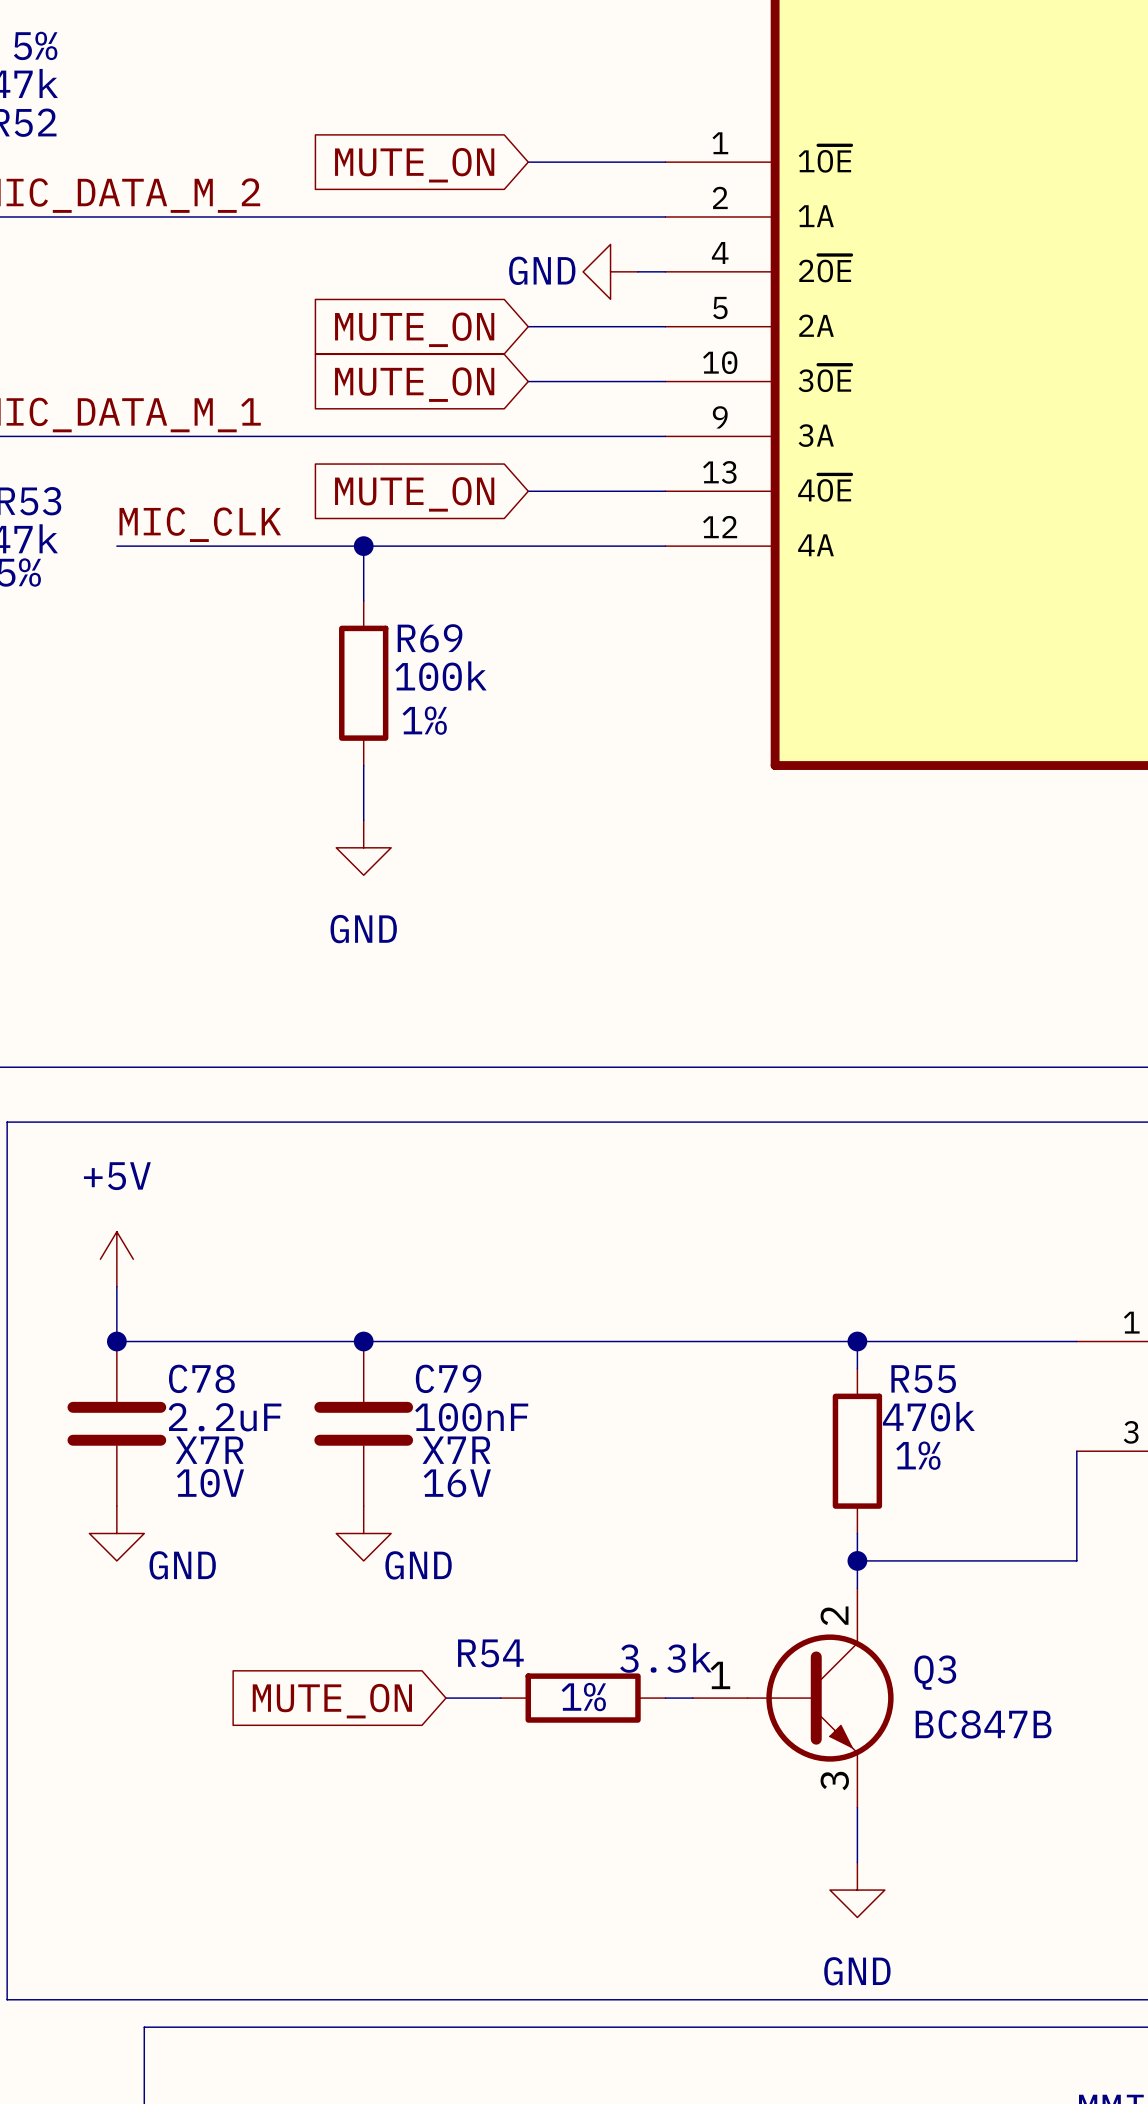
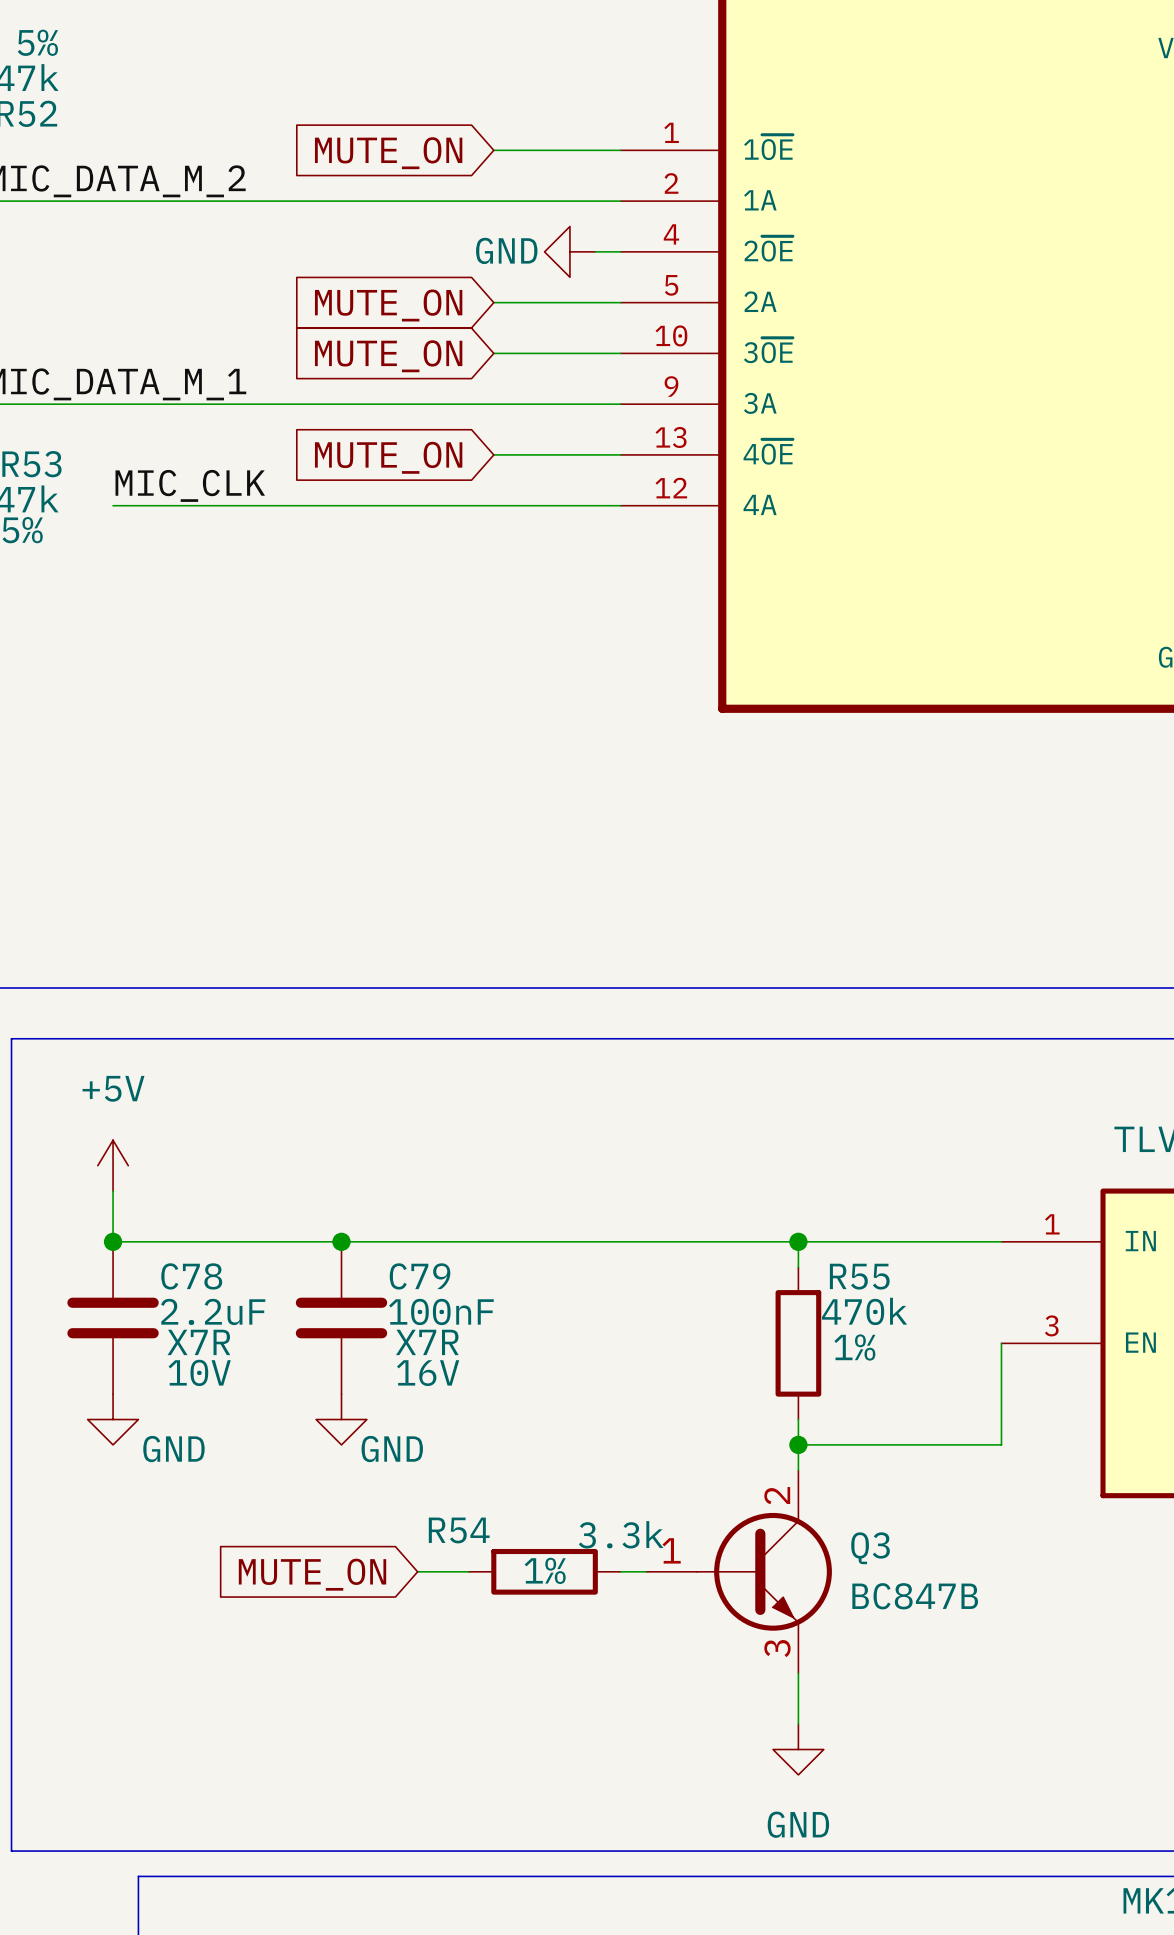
wire: (363, 546) (363, 600) -> none
junction: (363, 546) -> none
R69: 100k (363, 683) -> none
wire: (363, 765) (363, 820) -> none
power symbol: GND (363, 847) -> none

